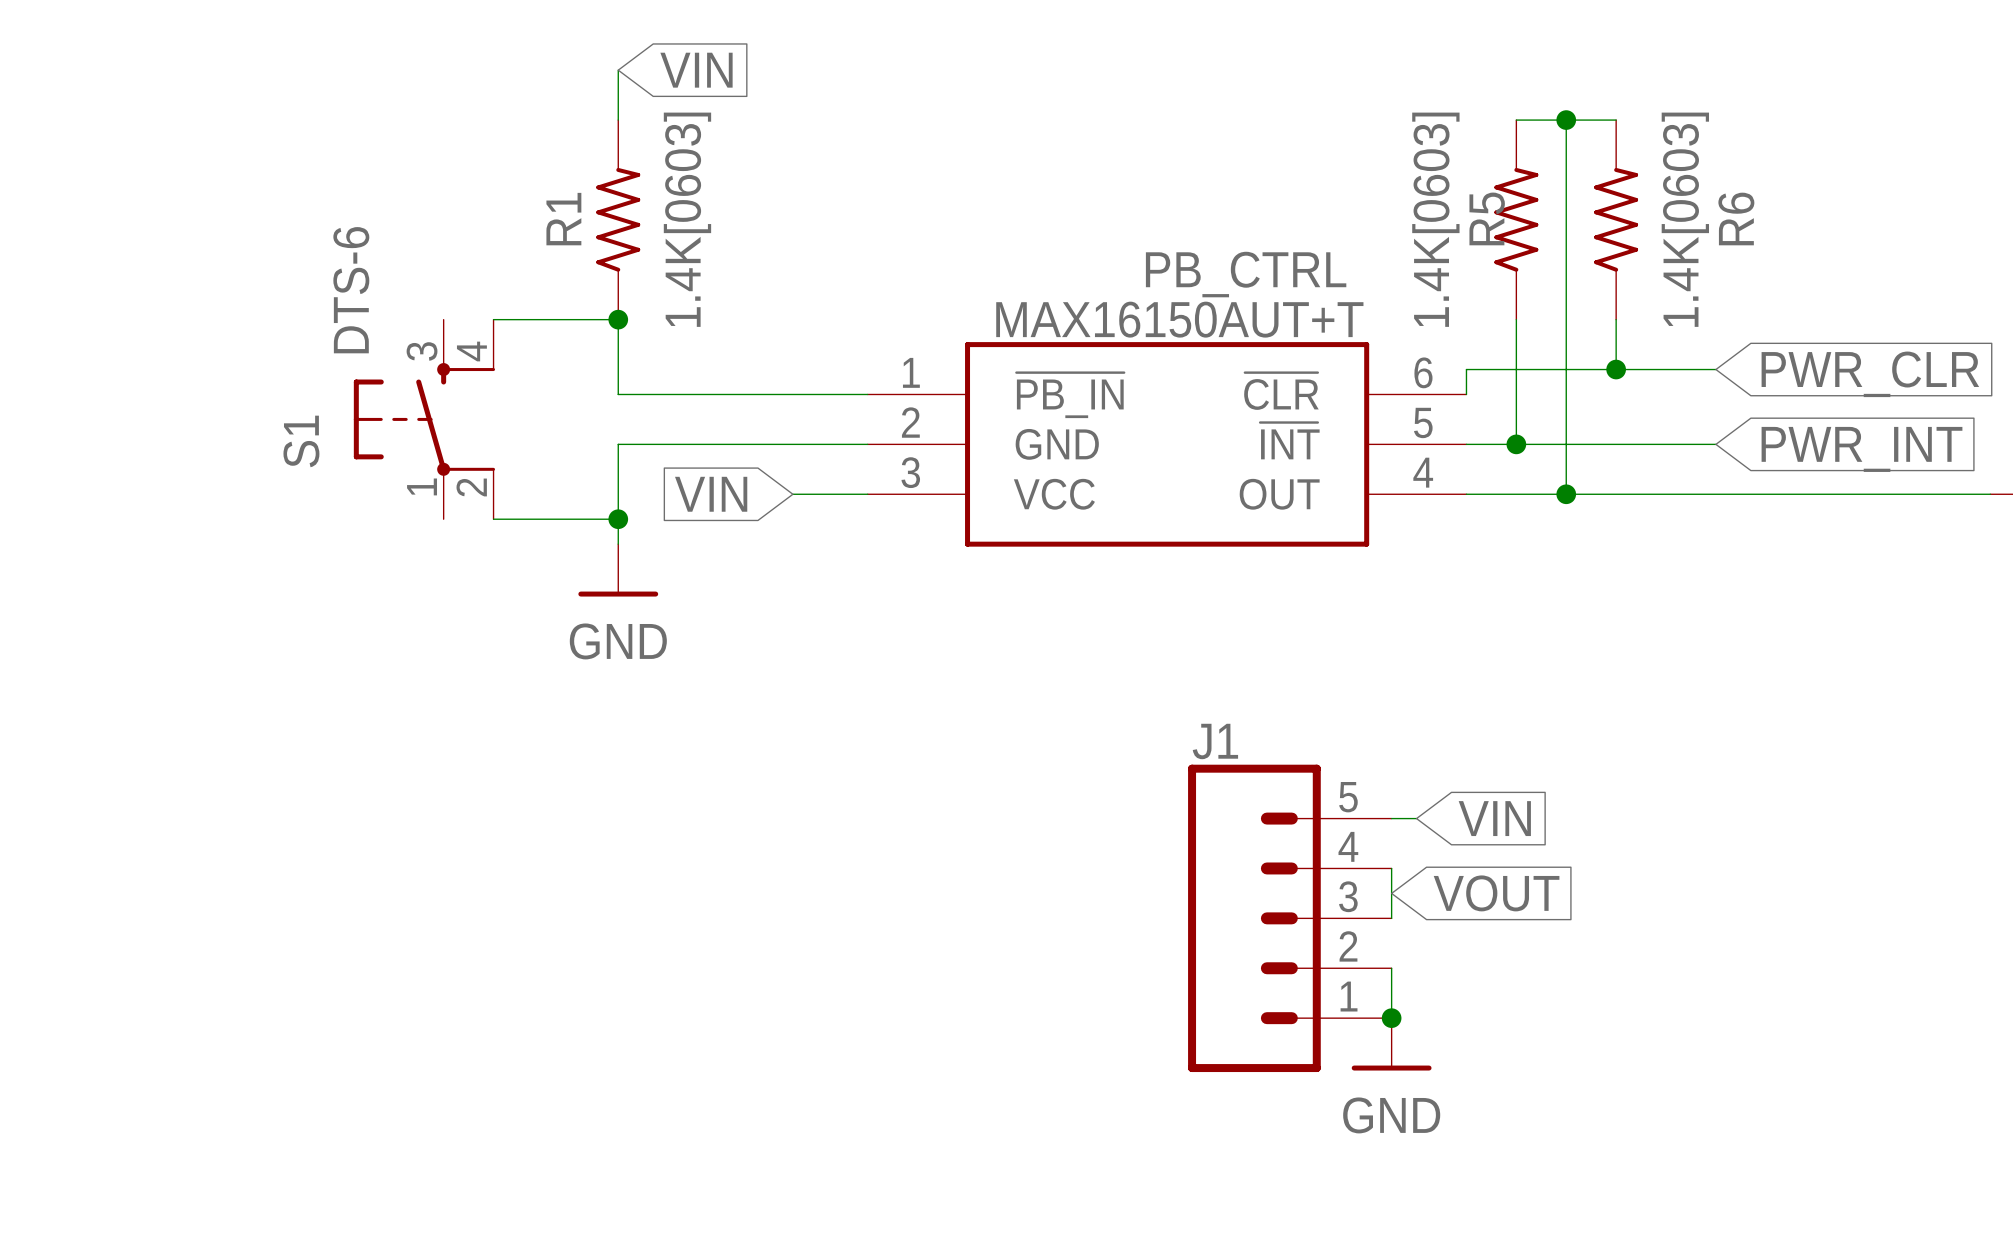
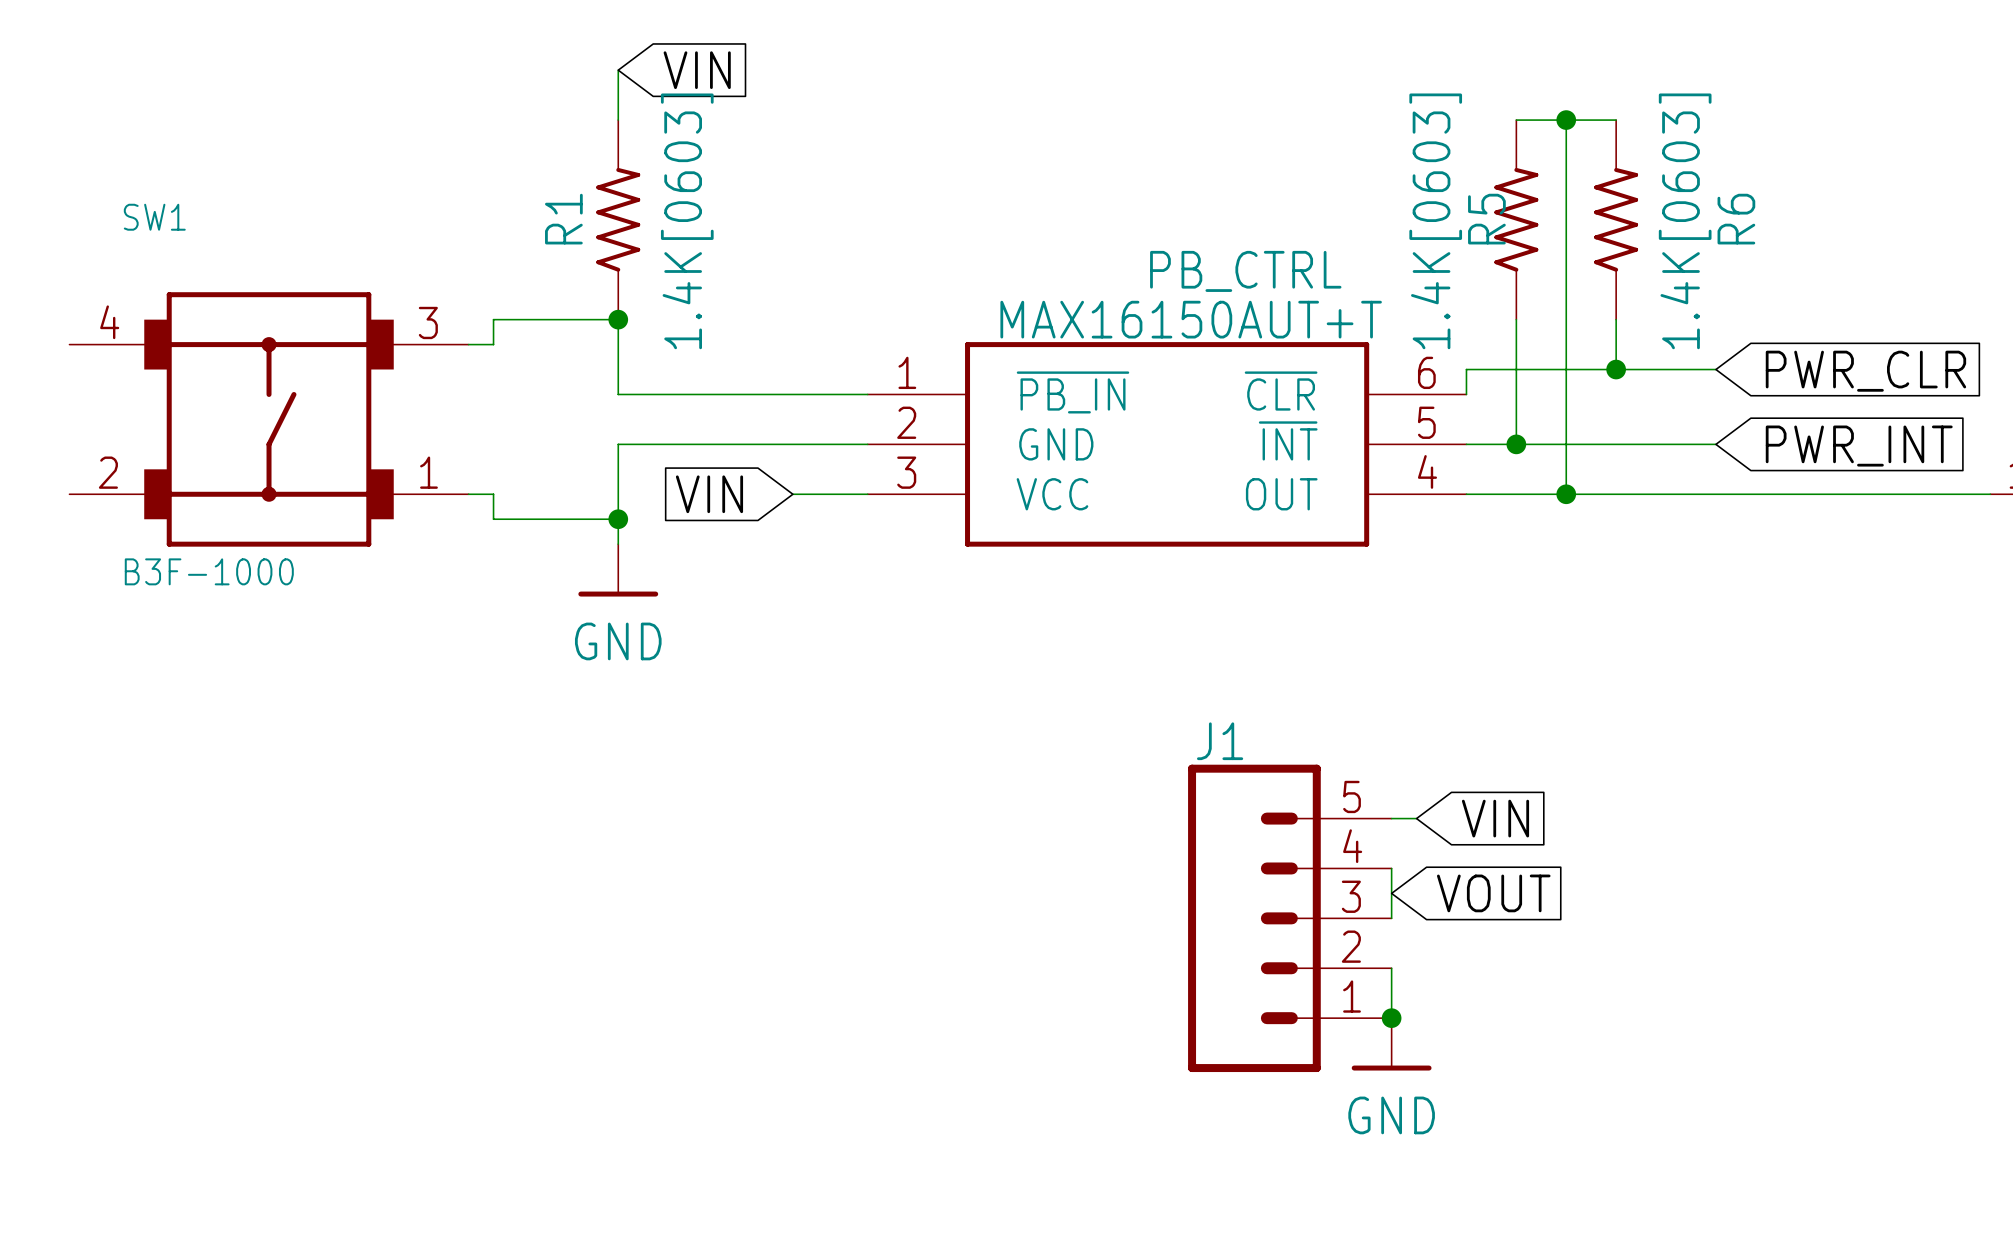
SW1: none -> B3F-1000 (269, 419)
S1: DTS-6 (424, 419) -> none

